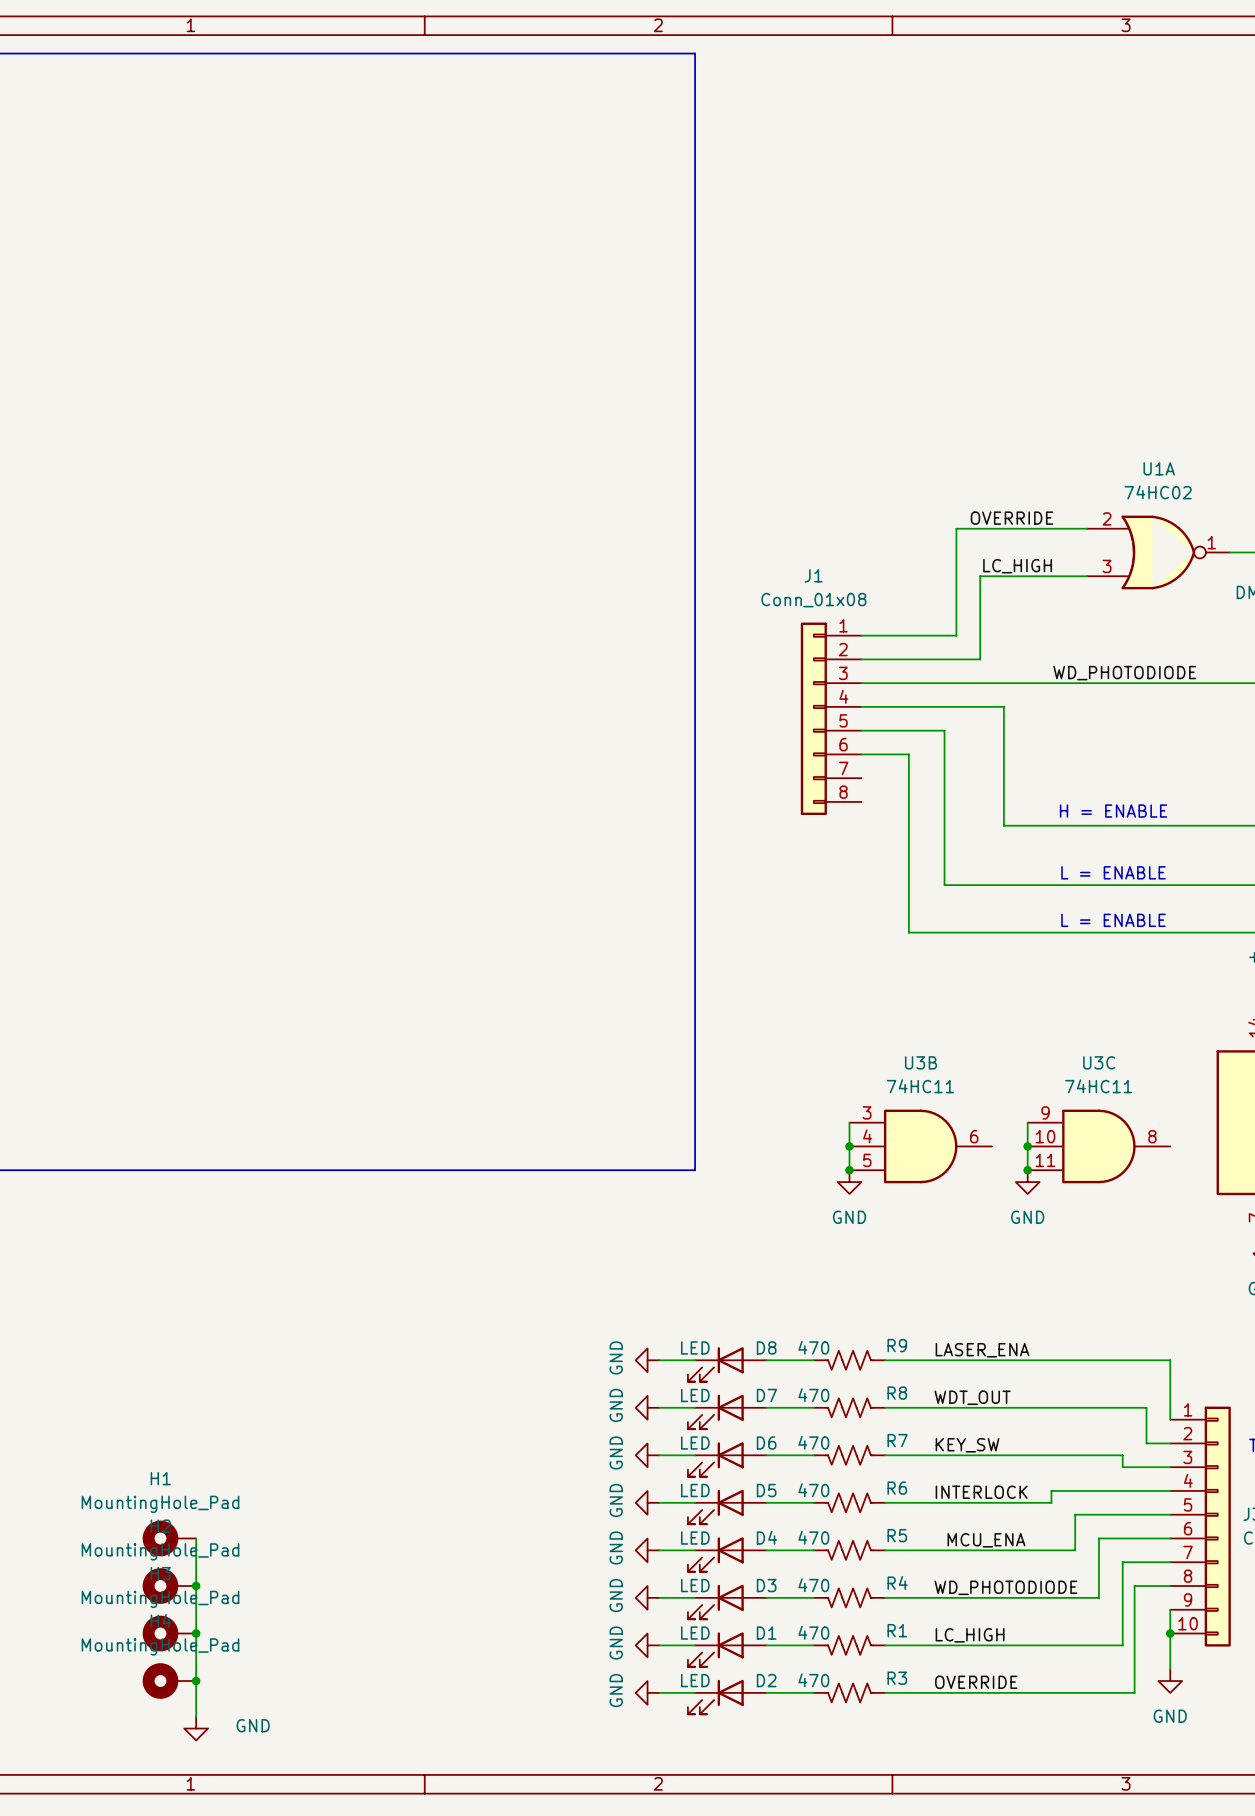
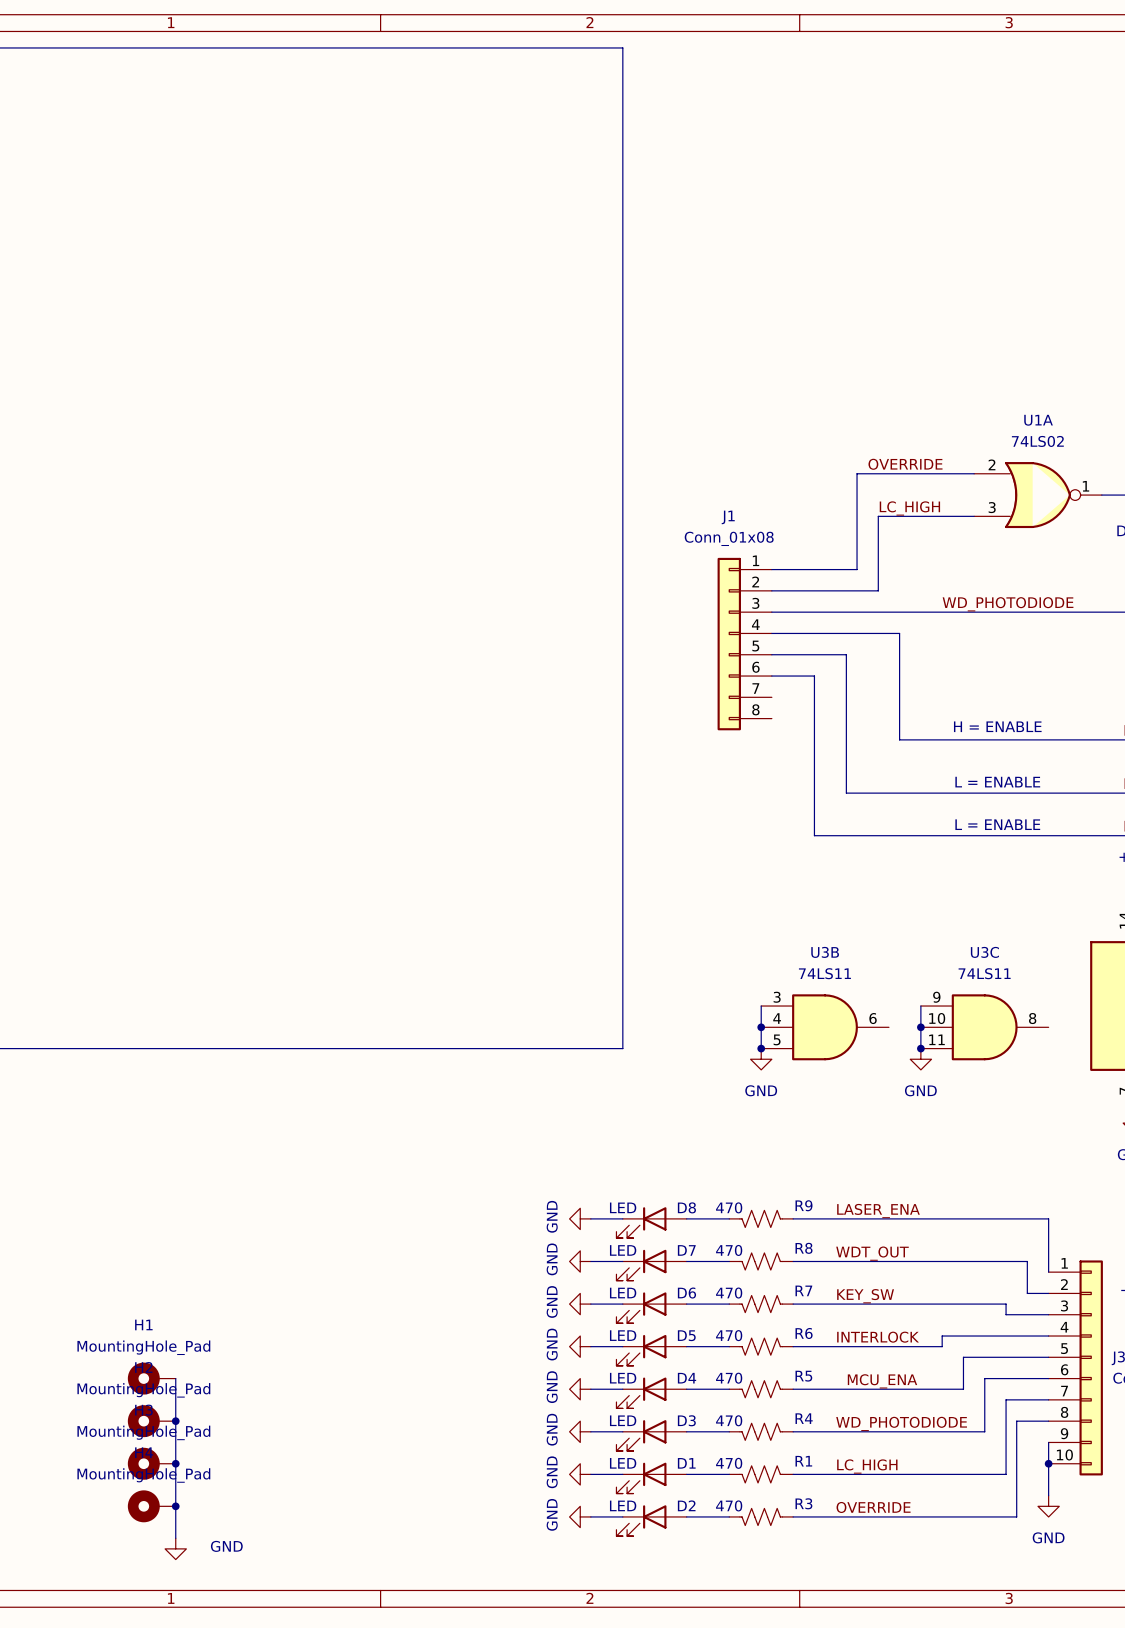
U1A value: 74HC02 (1158, 492) -> 74LS02 (1037, 441)
U3B value: 74HC11 (920, 1086) -> 74LS11 (824, 973)
U3C value: 74HC11 (1098, 1086) -> 74LS11 (984, 973)

